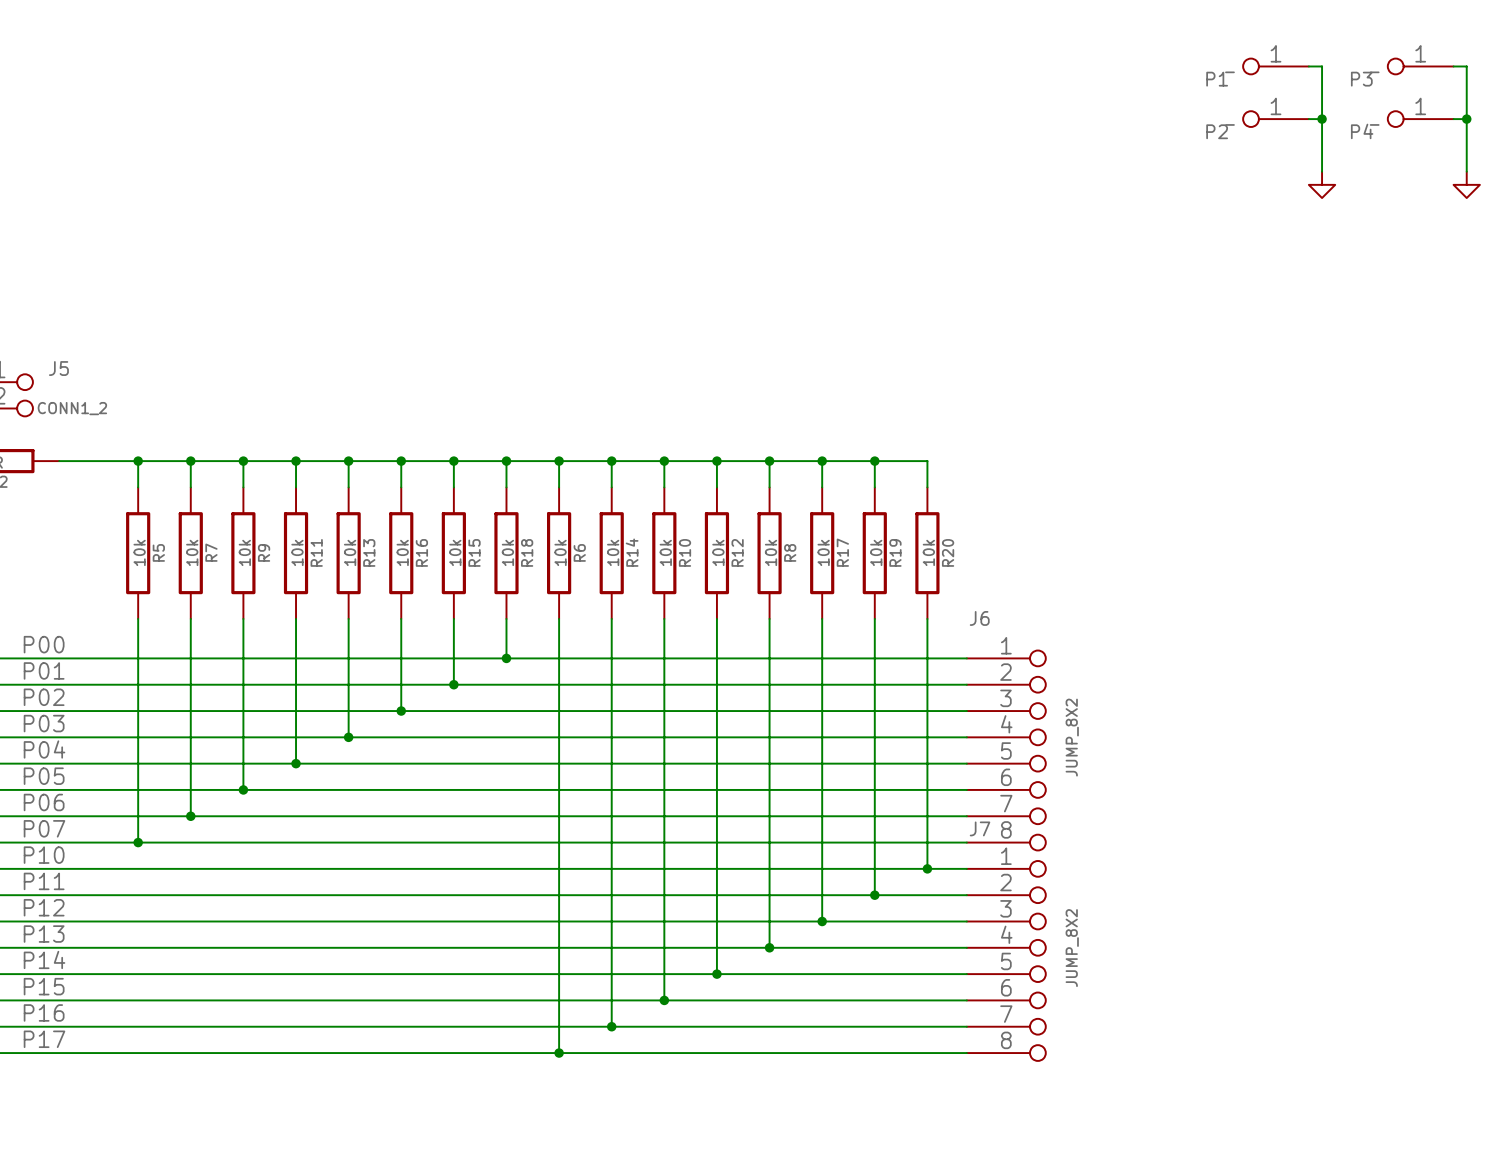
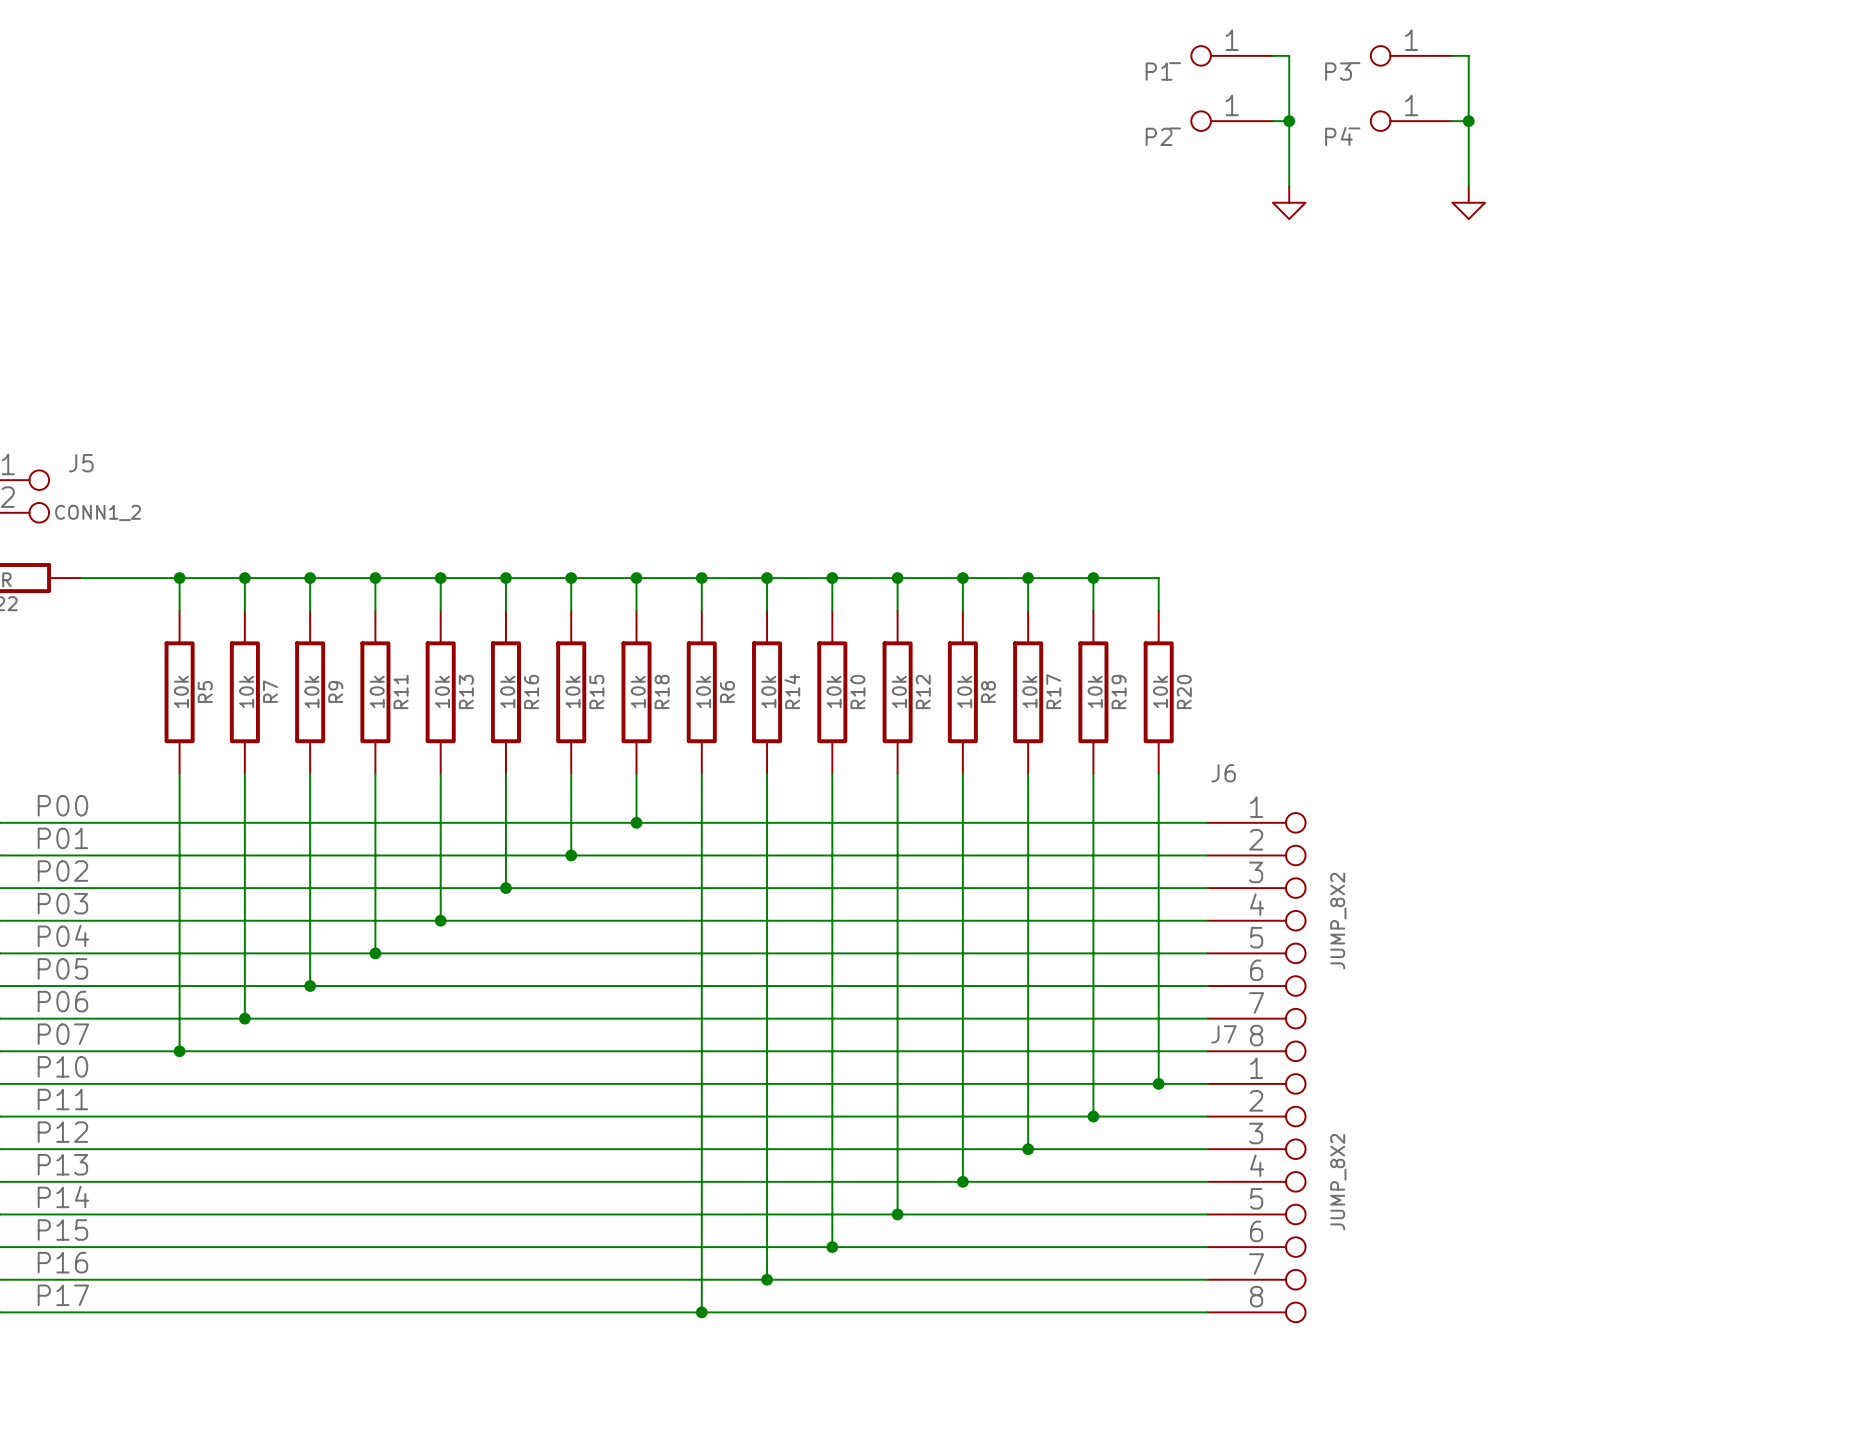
wire: none -> (1272, 55) (1289, 55) (1289, 186)
P1 position: (1276, 66) -> (1232, 55)
wire: (1308, 66) (1322, 66) (1322, 171) -> (1452, 55) (1468, 55) (1468, 186)
P3 position: (1420, 66) -> (1411, 55)
wire: (1453, 66) (1466, 66) (1466, 171) -> none
wire: none -> (1272, 121) (1289, 121)
junction: none -> (1289, 121)
junction: none -> (1468, 121)
P2 position: (1276, 119) -> (1232, 121)
wire: (1308, 119) (1322, 119) -> (1452, 121) (1468, 121)
junction: (1322, 119) -> none
P4 position: (1420, 119) -> (1411, 121)
wire: (1453, 119) (1466, 119) -> none
junction: (1466, 119) -> none
power symbol: none -> (1289, 202)
power symbol: none -> (1468, 202)
power symbol: (1322, 184) -> none
power symbol: (1466, 184) -> none

